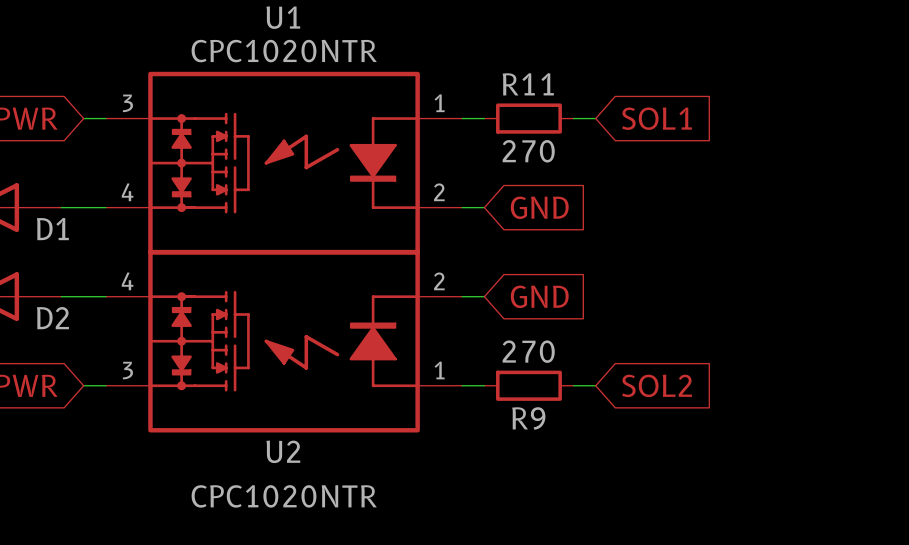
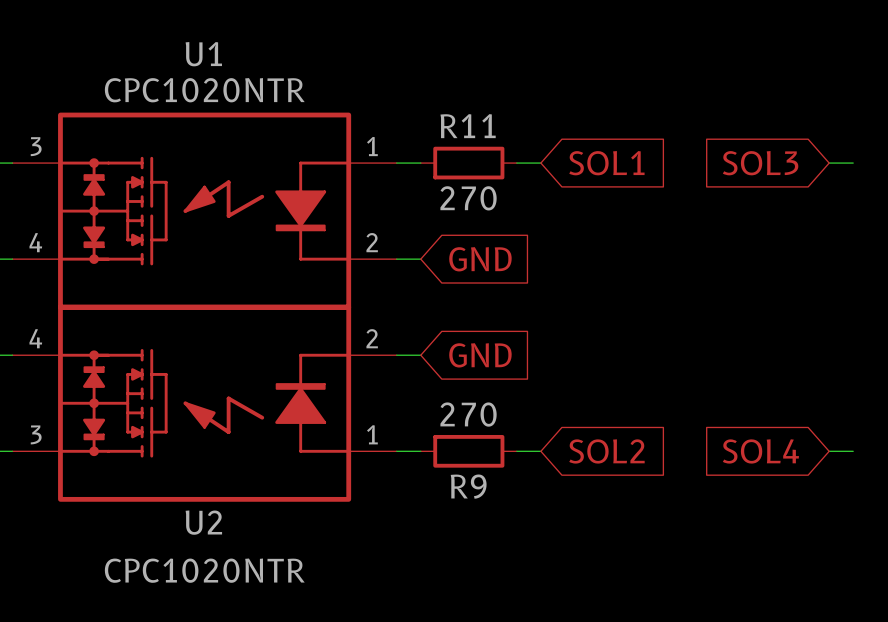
global label: none -> SOL3 (760, 163)
wire: none -> (829, 163) (853, 163)
global label: none -> SOL4 (760, 451)
wire: none -> (829, 451) (853, 451)

